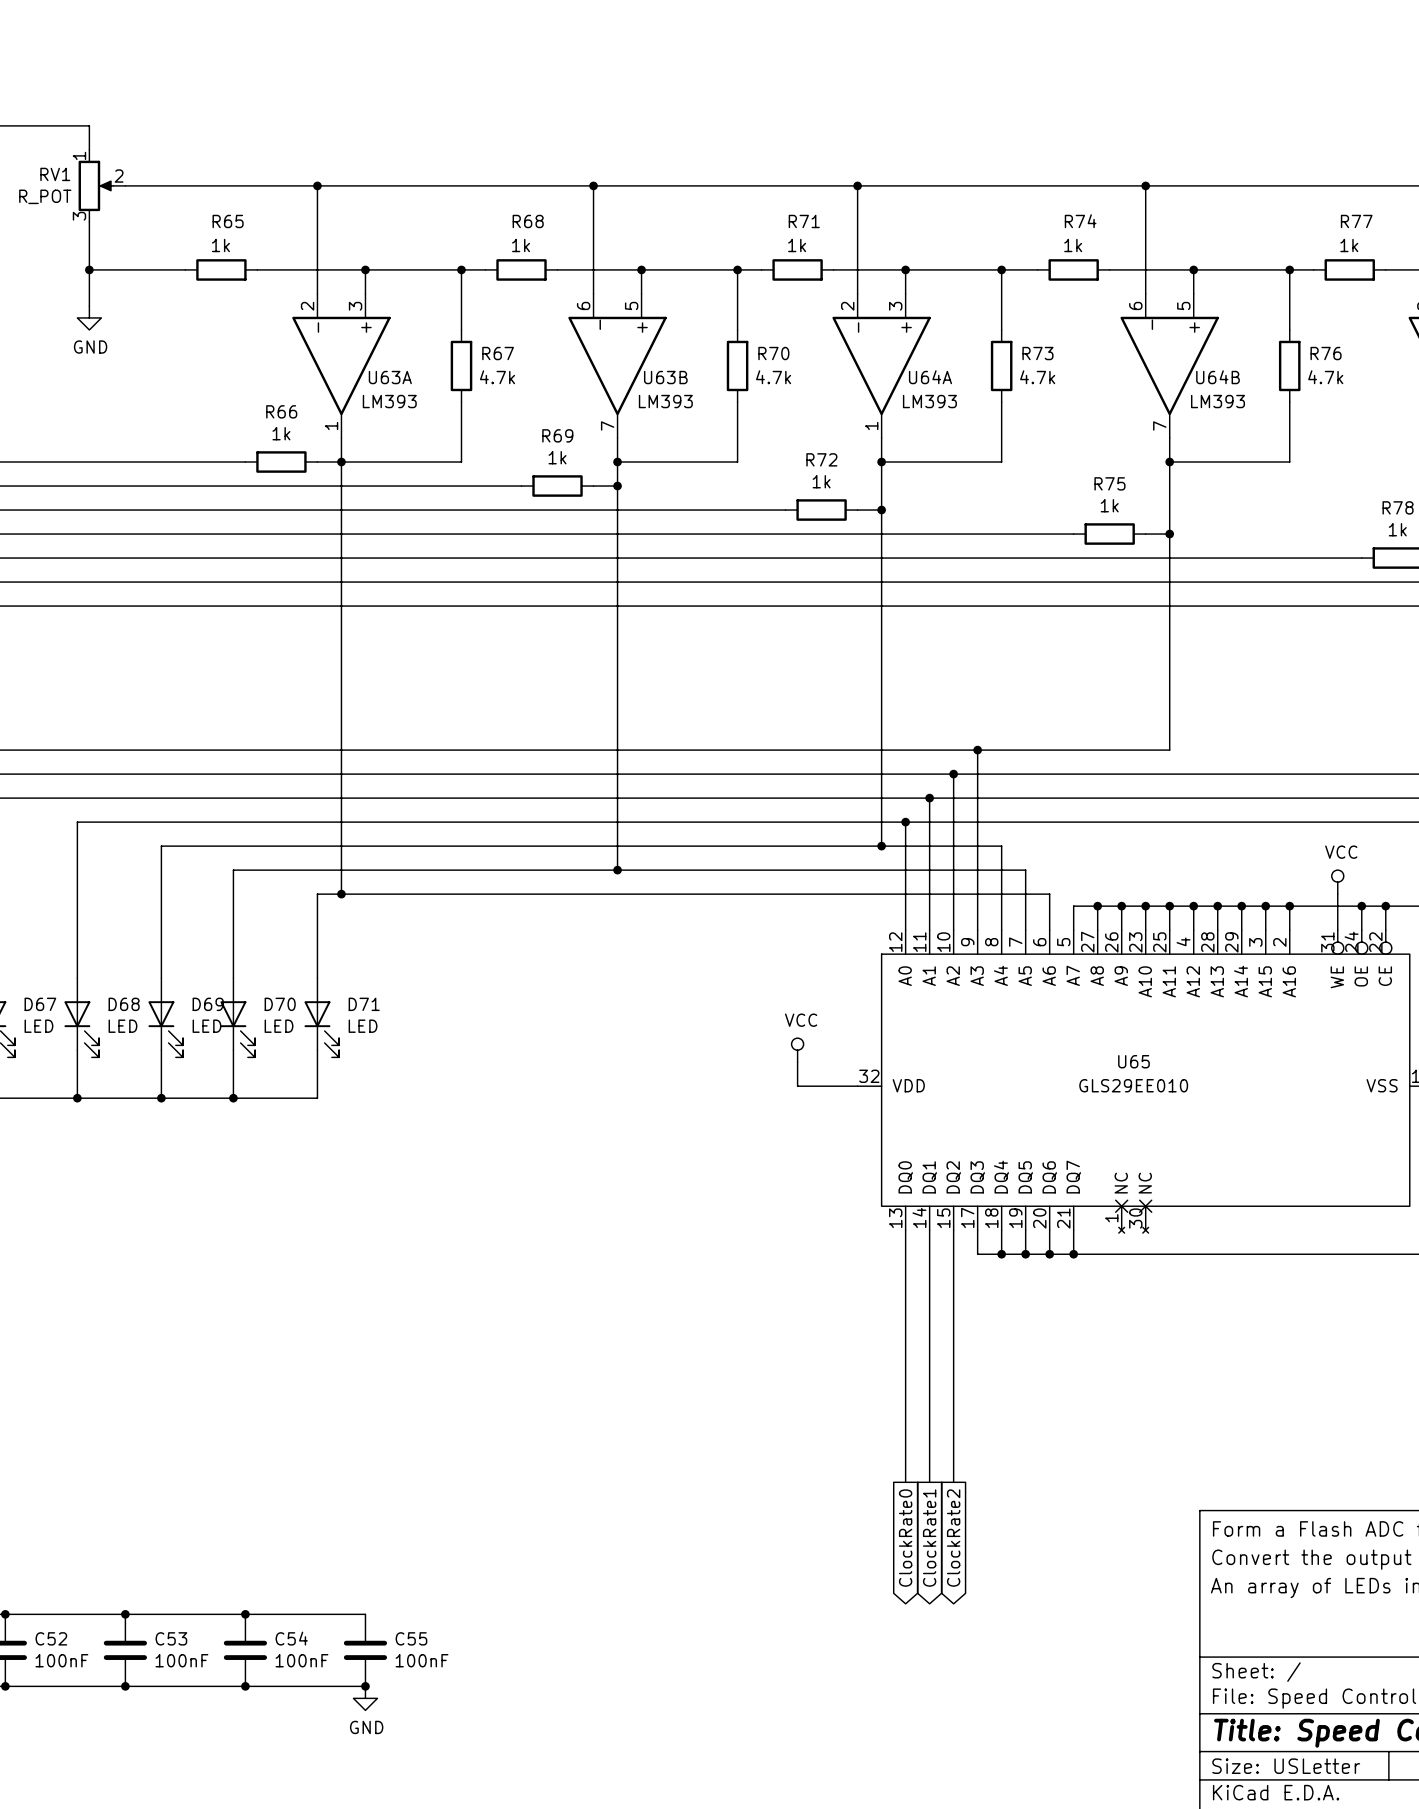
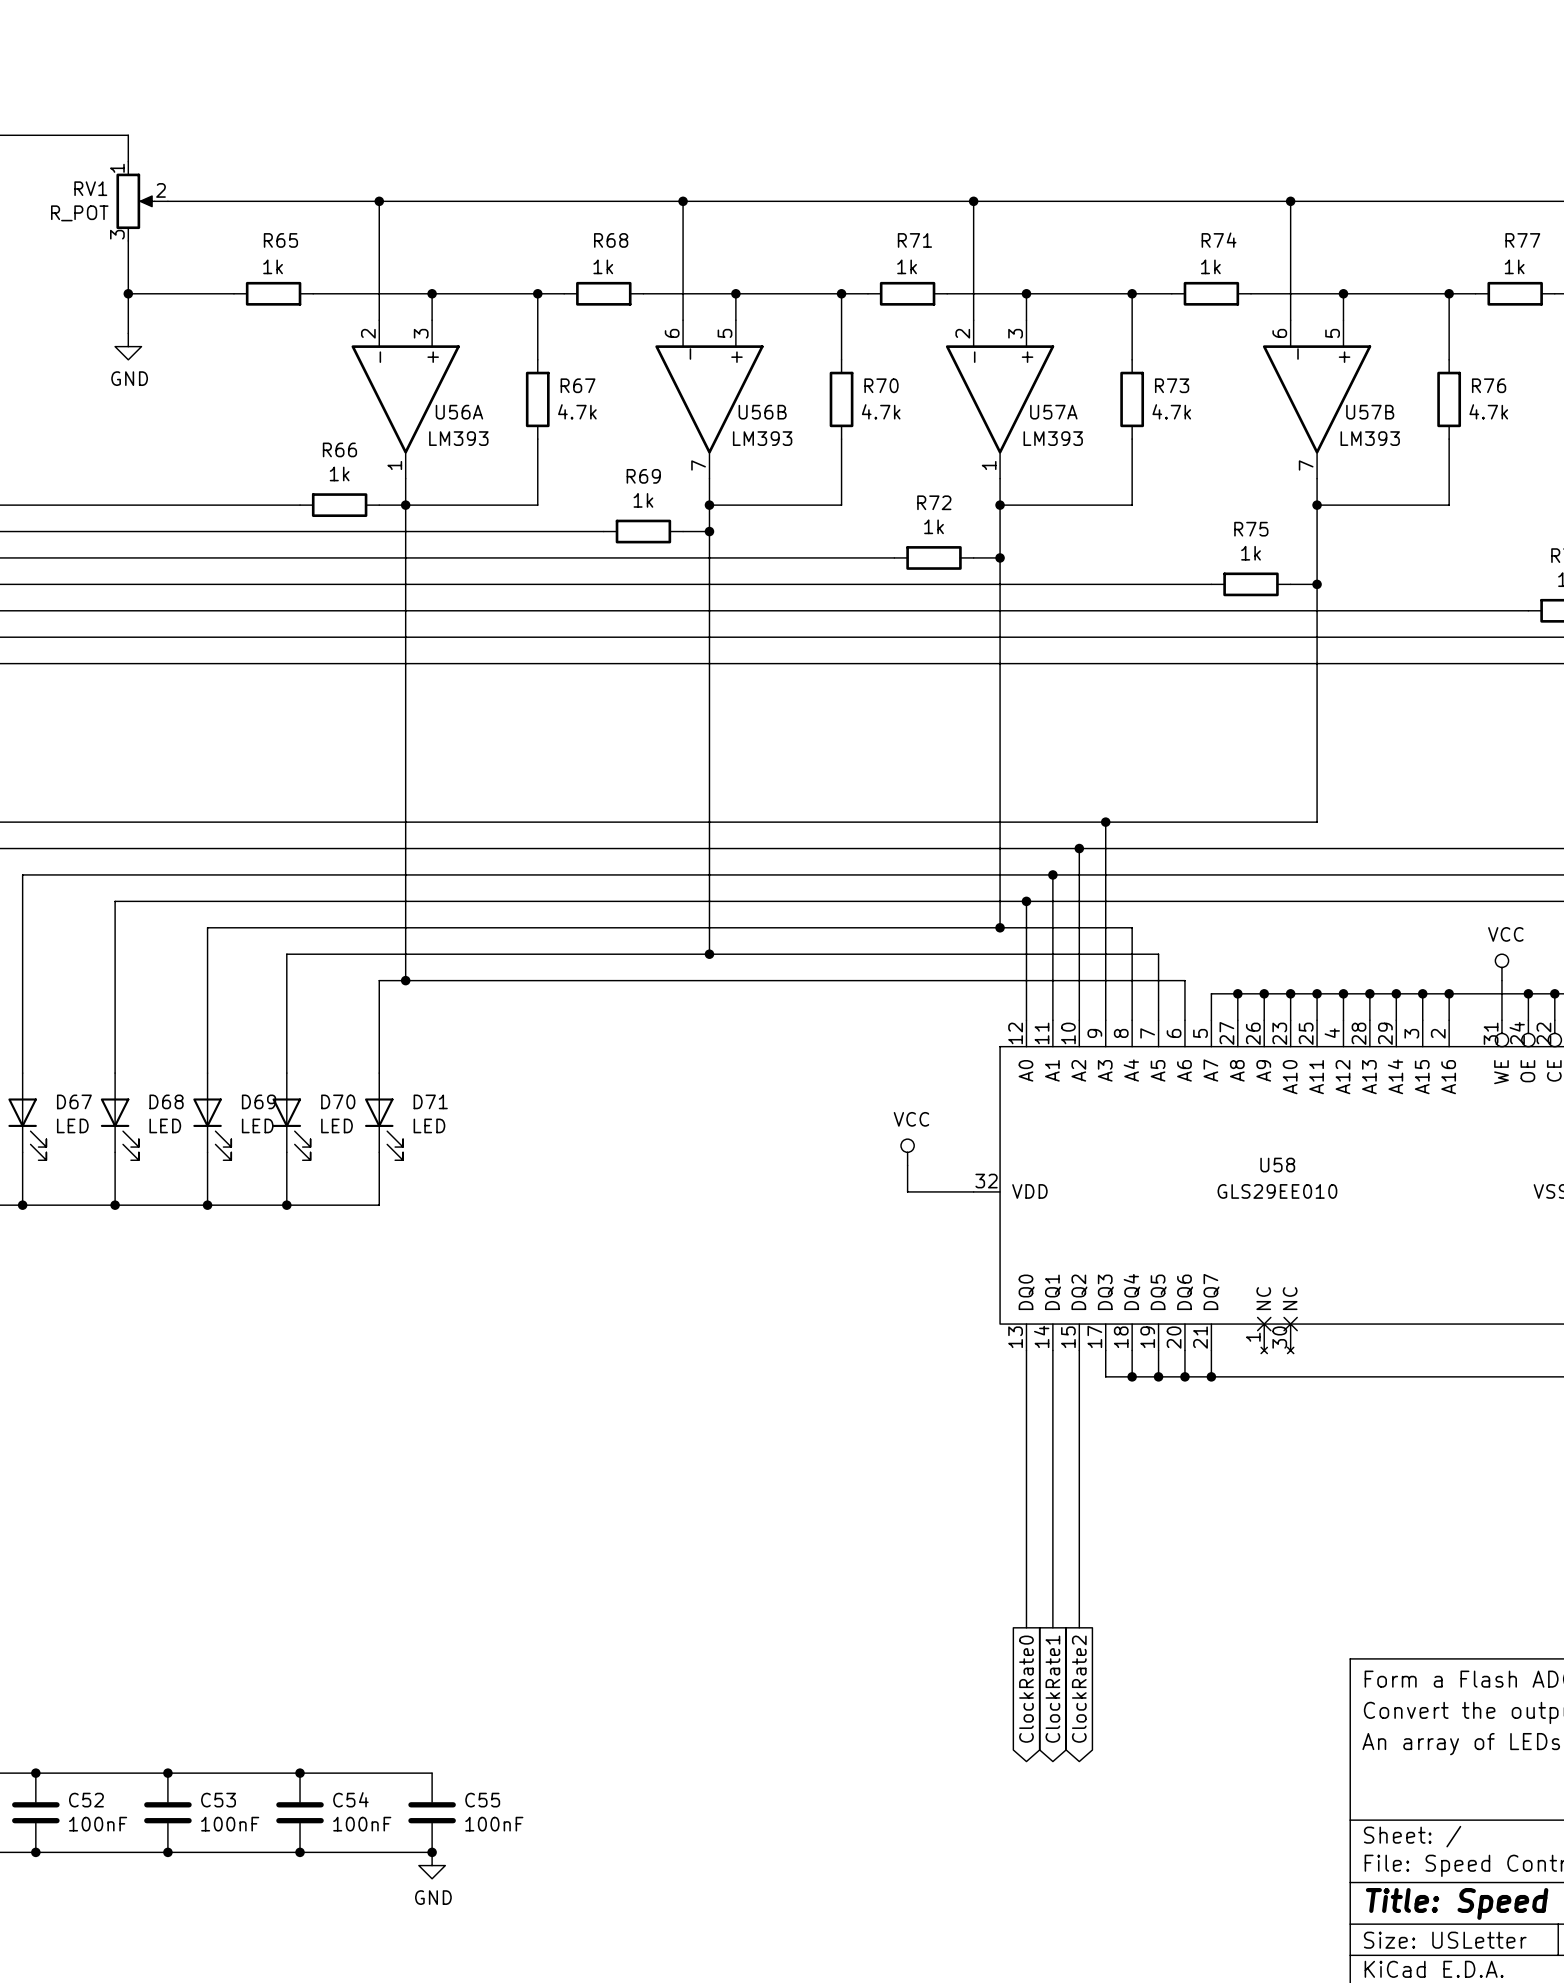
U63A name: U63A (390, 377) -> U56A (459, 412)
U63B name: U63B (665, 377) -> U56B (762, 412)
U64A name: U64A (930, 377) -> U57A (1053, 412)
U64B name: U64B (1218, 377) -> U57B (1370, 412)
U65 name: U65 (1133, 1061) -> U58 (1277, 1165)

